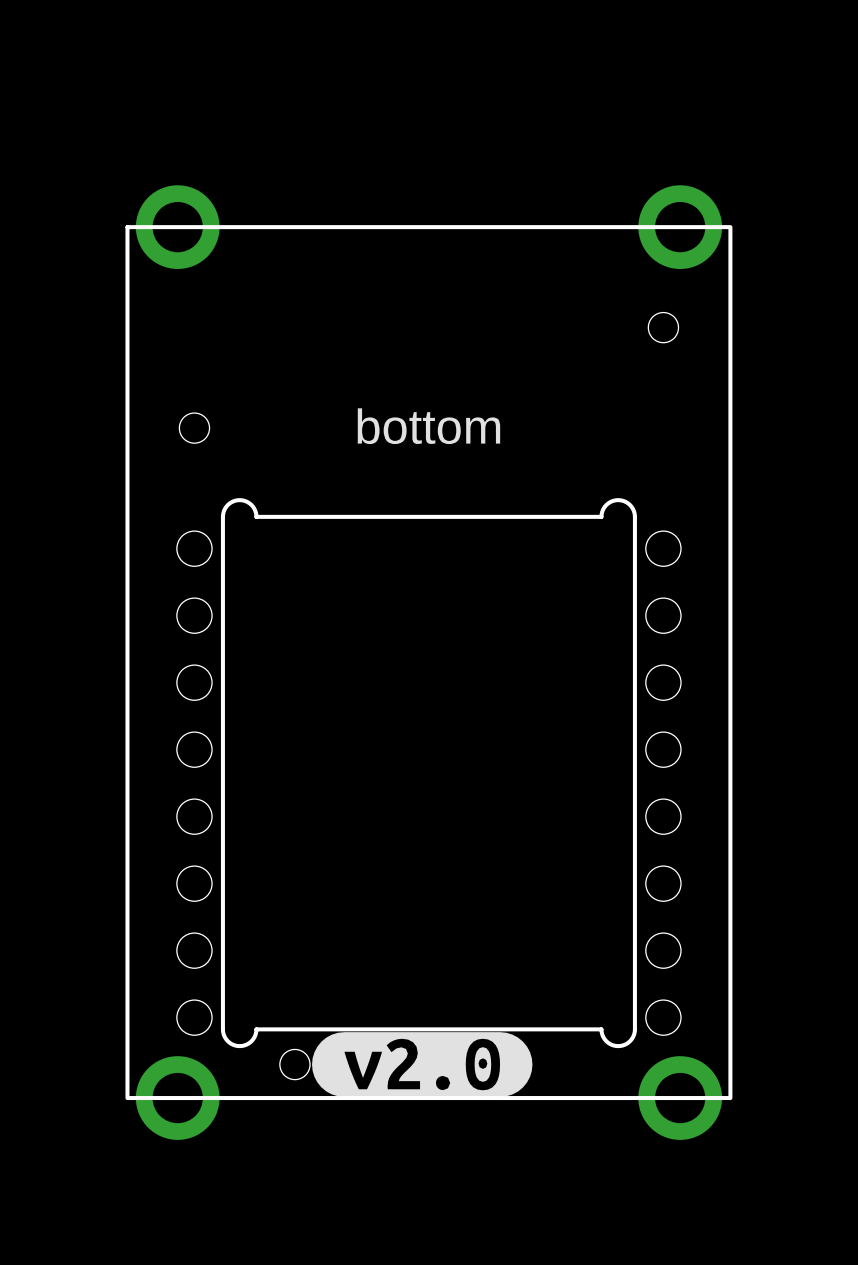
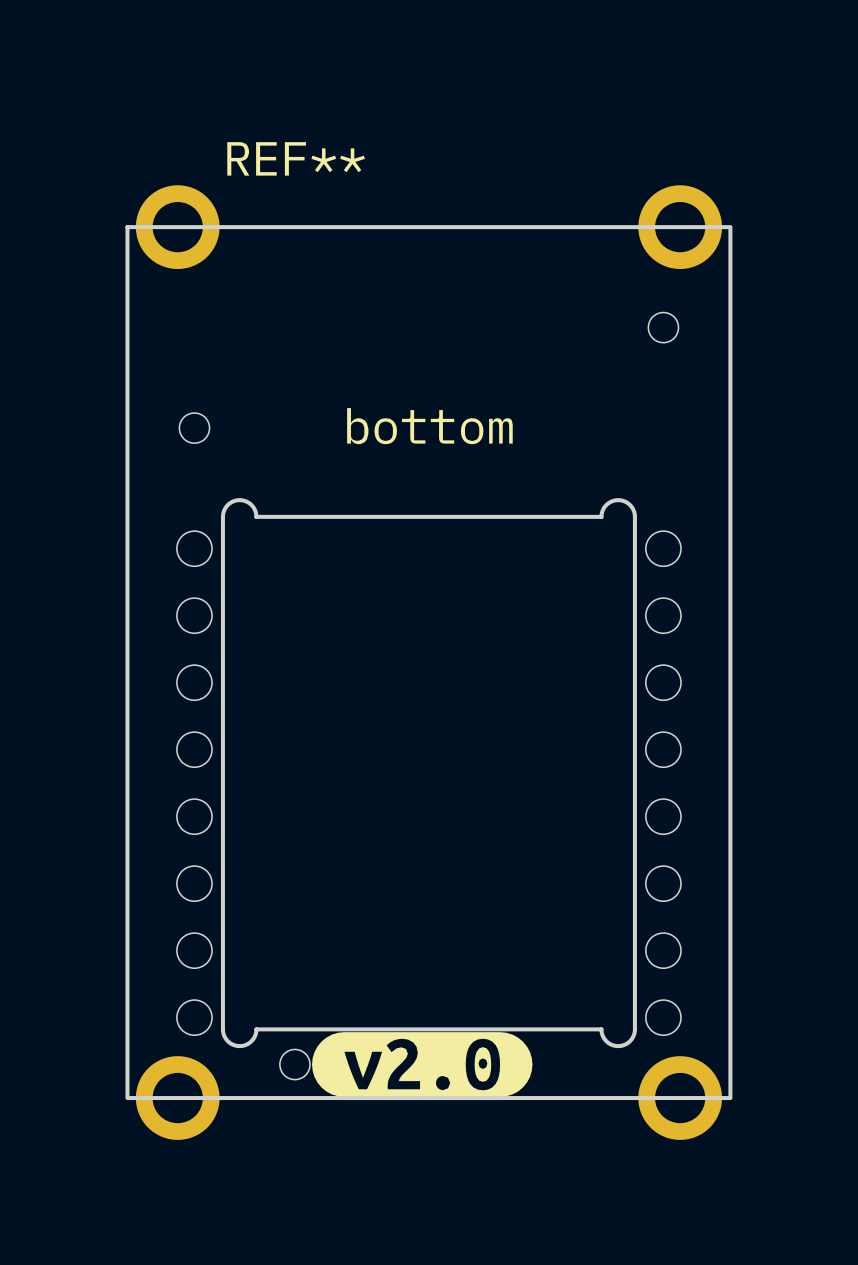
REF** name: none -> REF** (296, 158)

